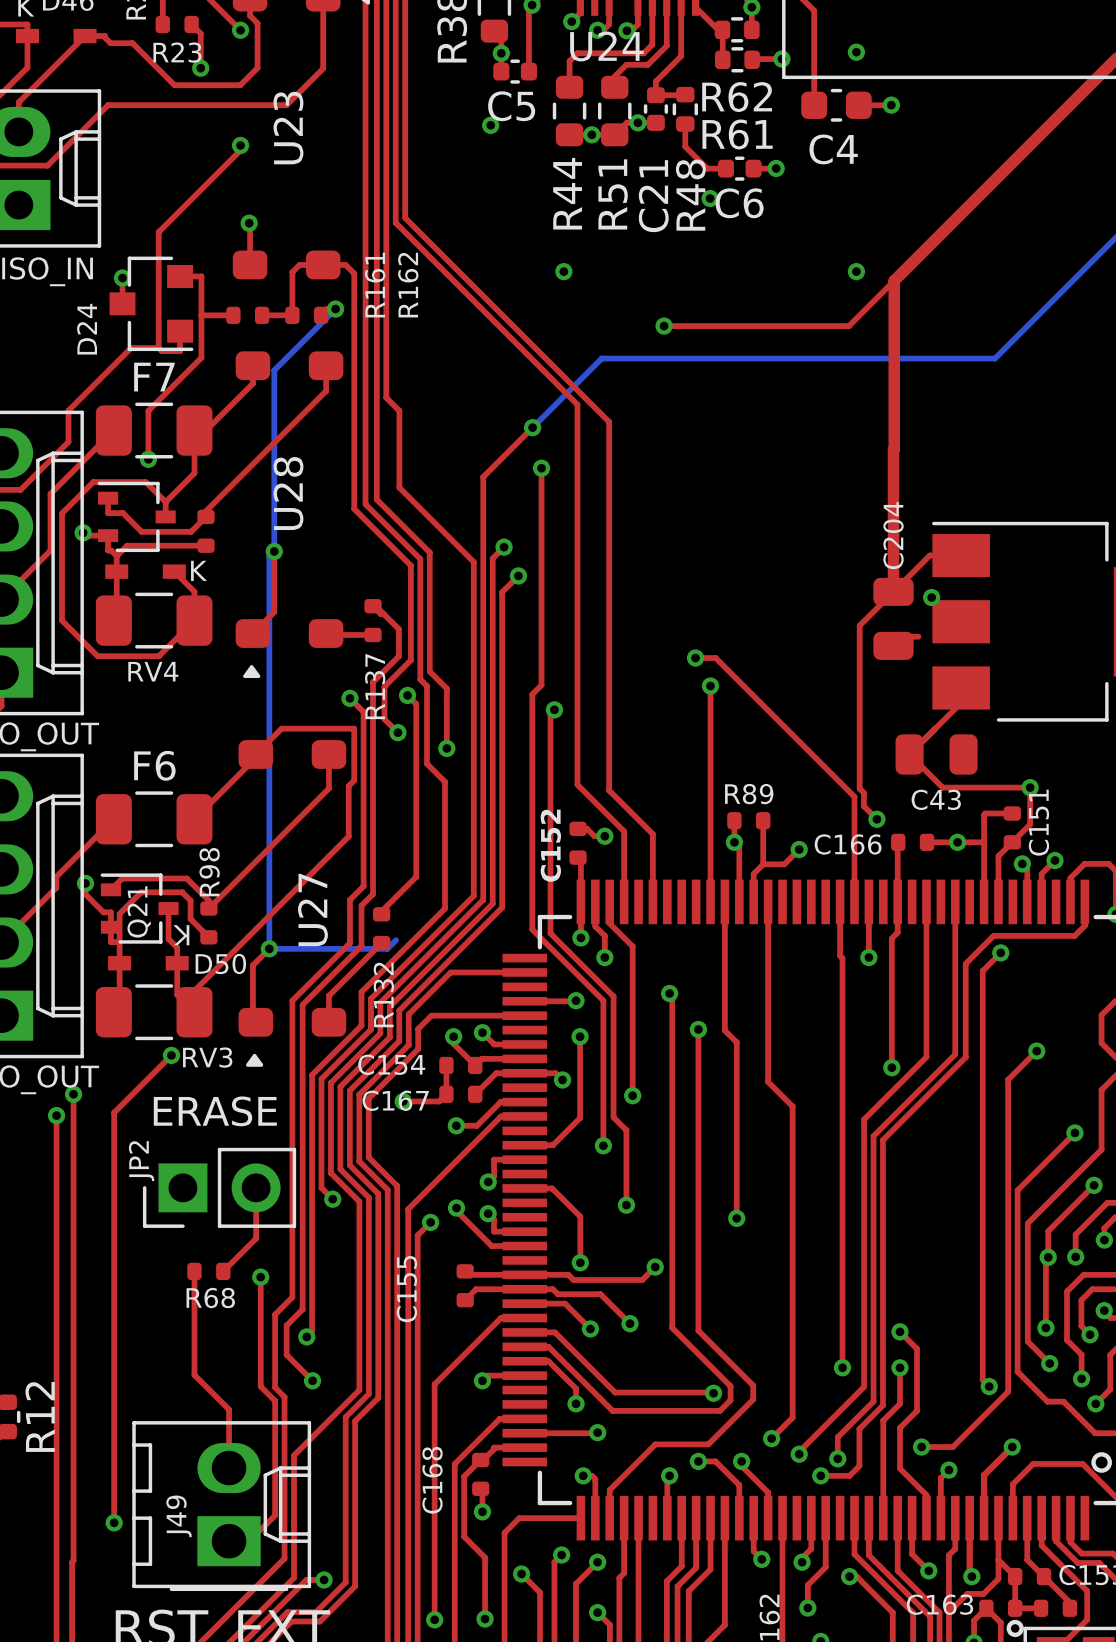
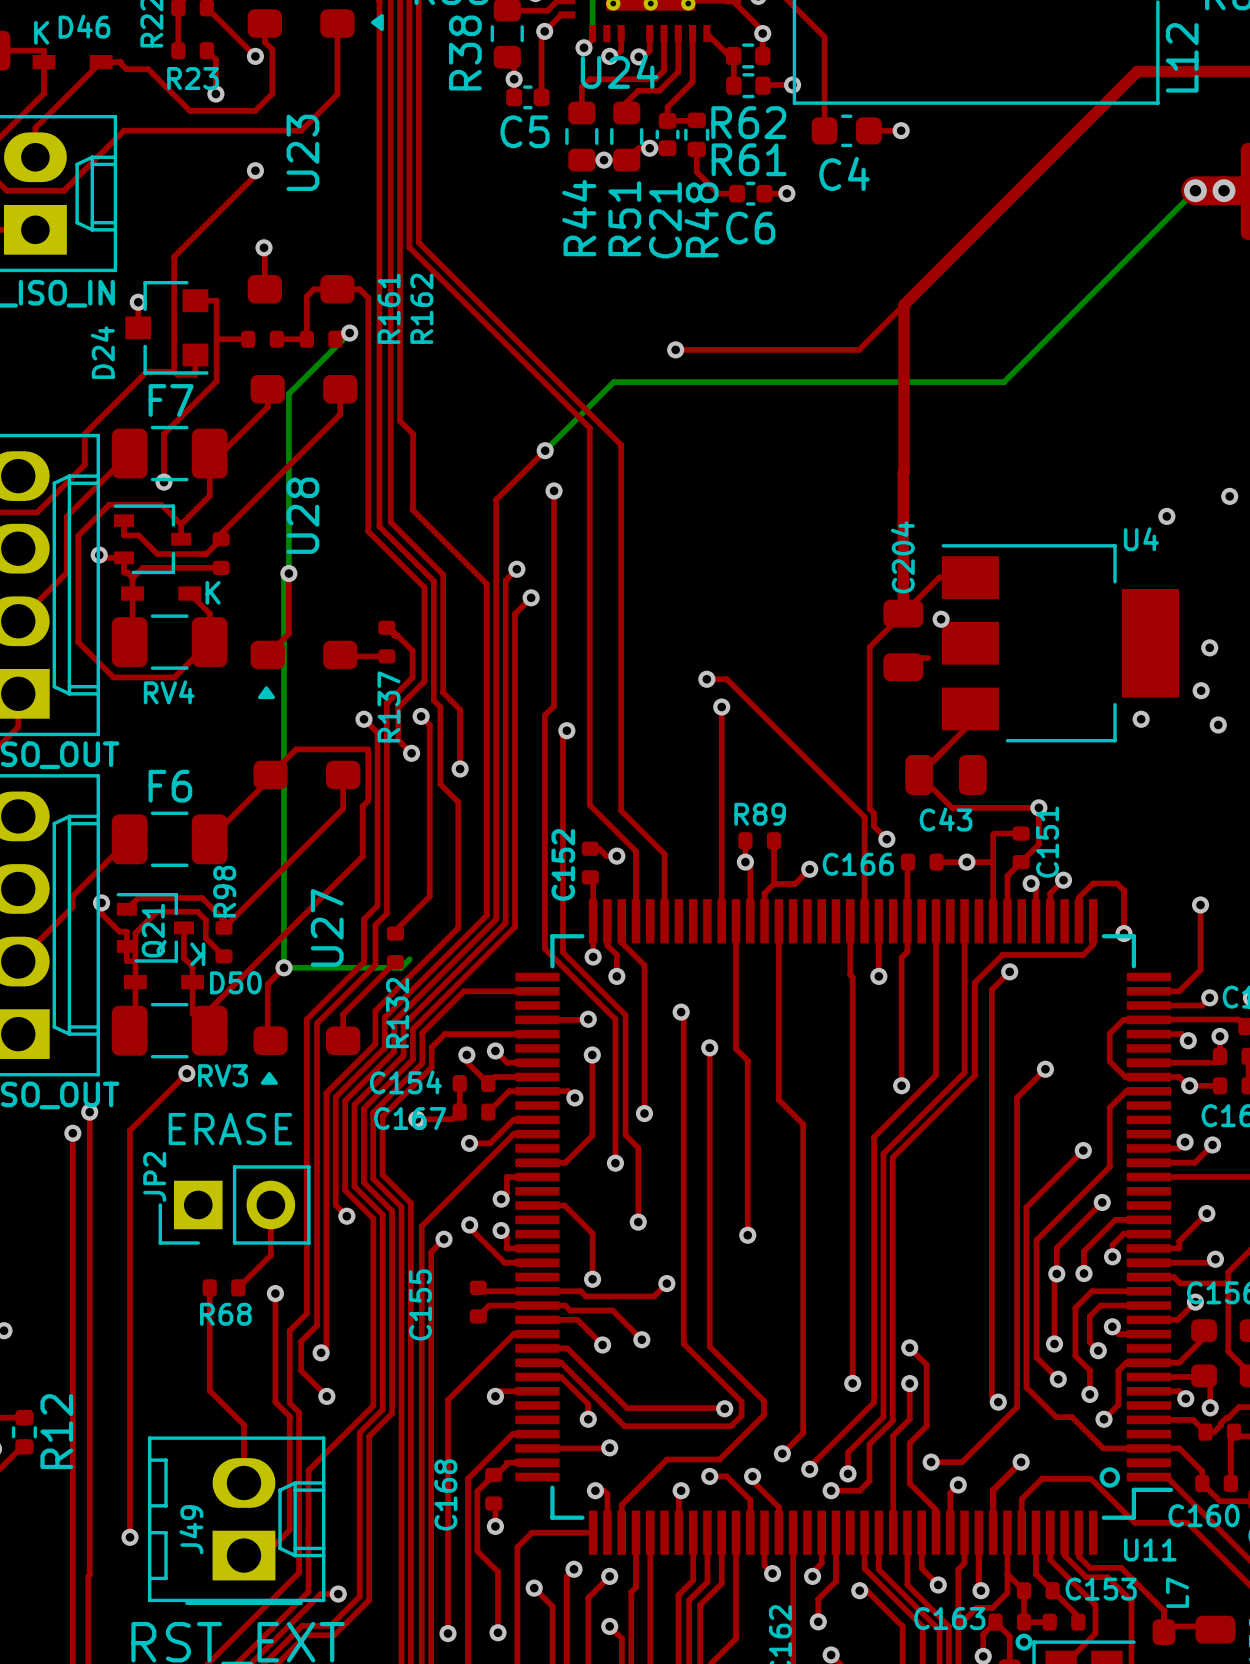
via: (856, 52) -> none
via: (490, 125) -> none
via: (710, 198) -> none
via: (563, 271) -> none
via: (856, 271) -> none

